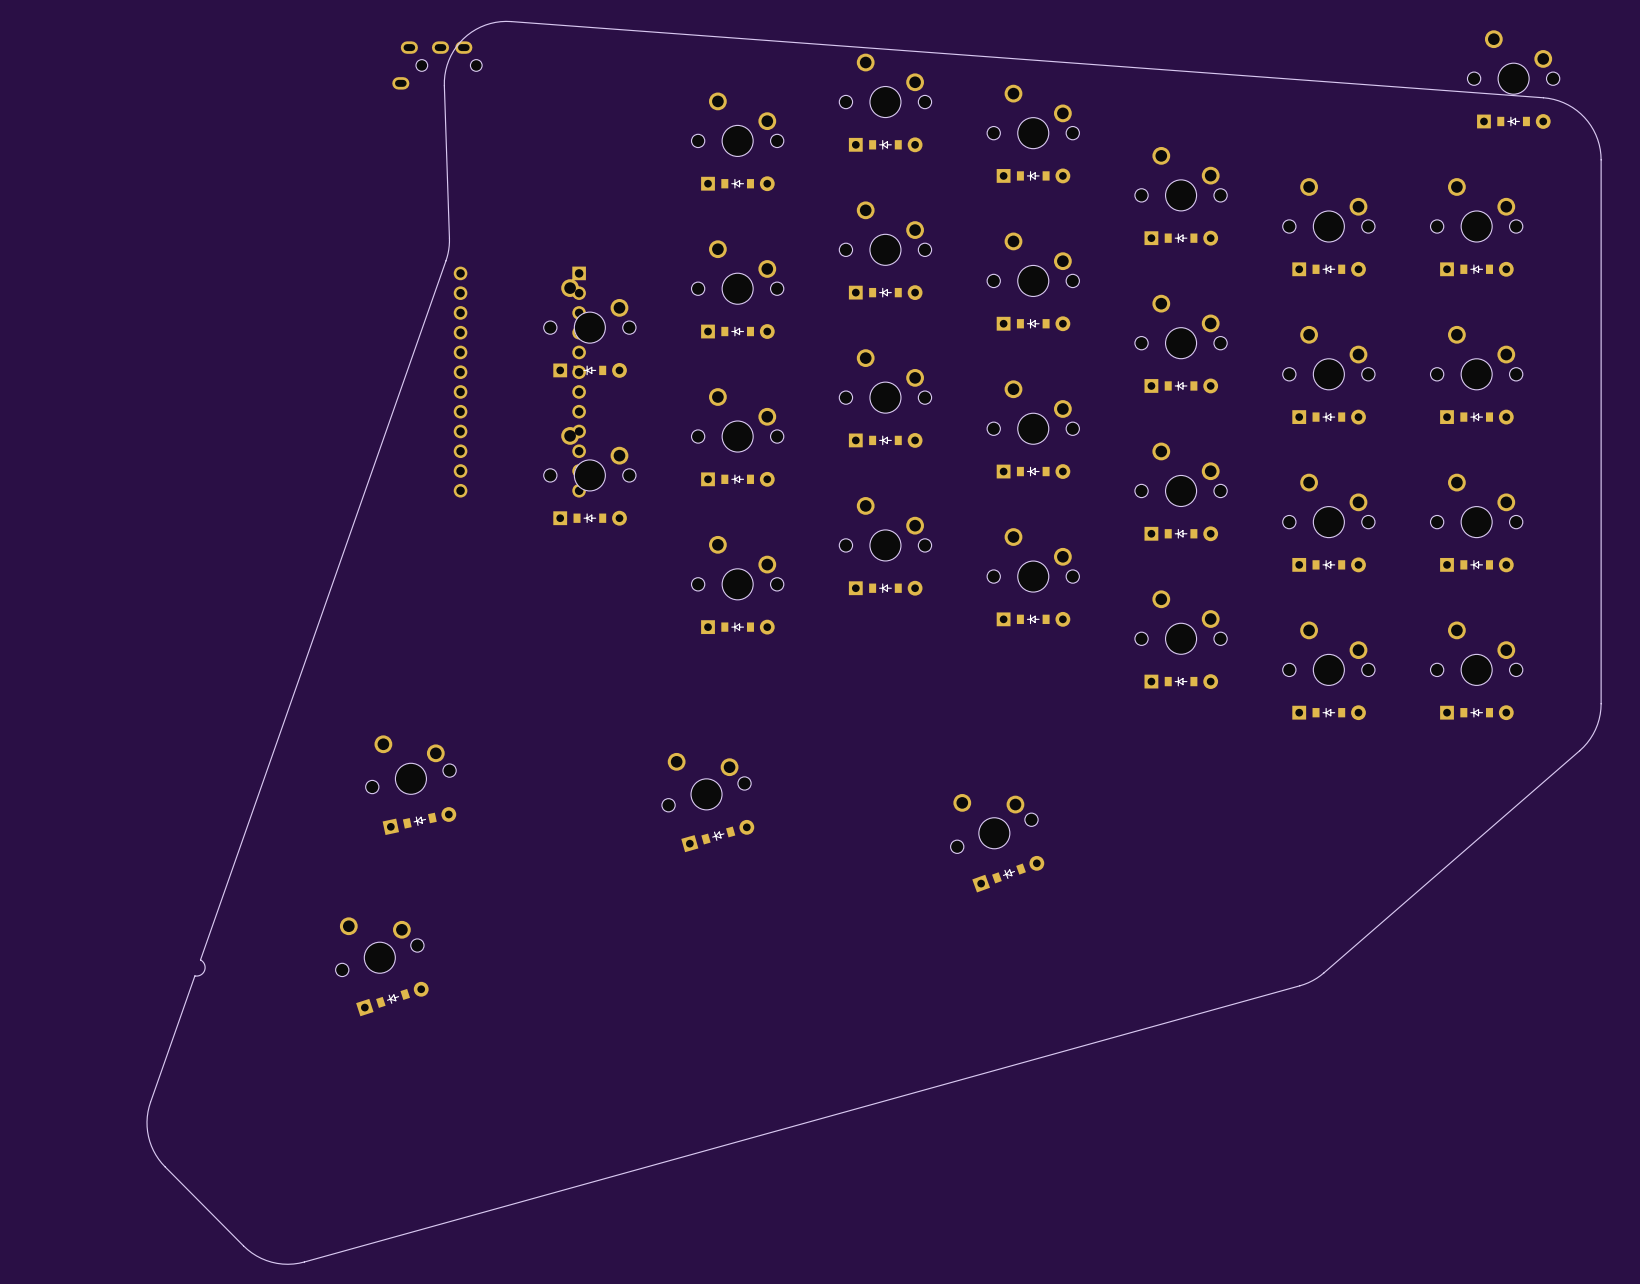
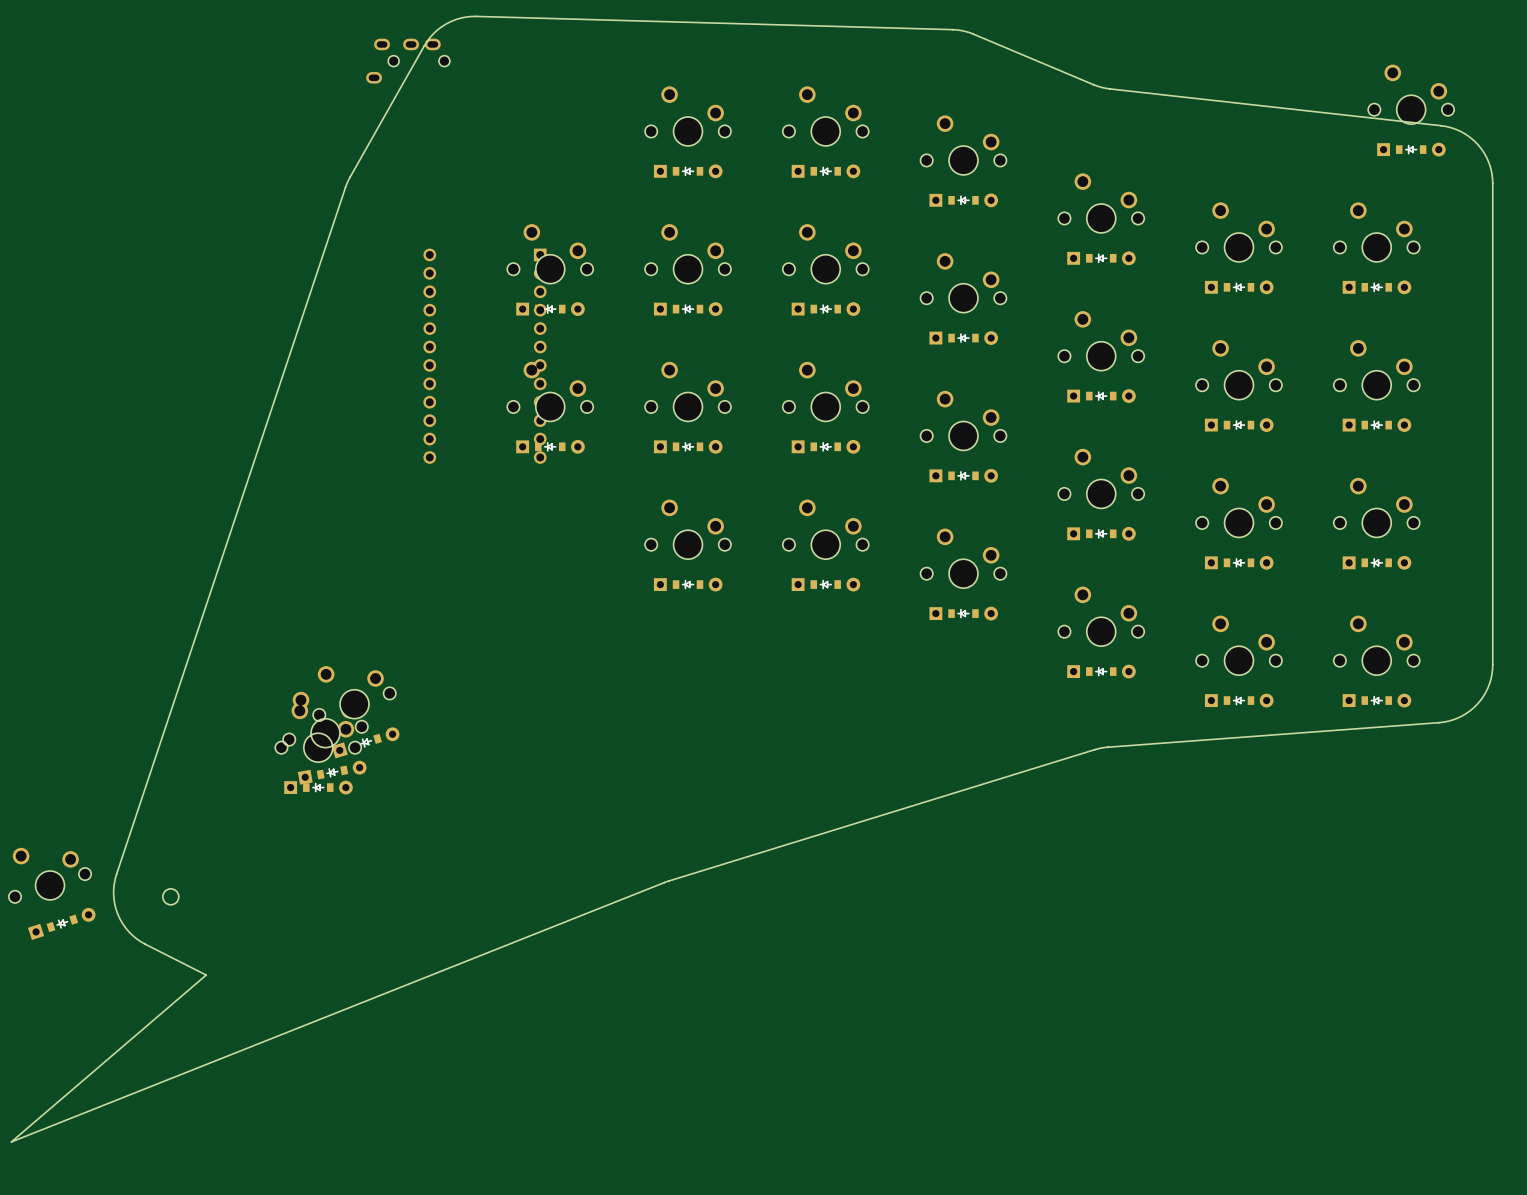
part position: (1513, 62) -> (1411, 94)
part position: (885, 85) -> (825, 116)
part position: (1033, 116) -> (963, 145)
part position: (1513, 121) -> (1411, 149)
part position: (885, 144) -> (825, 171)
part position: (1033, 175) -> (963, 200)
part position: (1181, 178) -> (1101, 203)
board edge: (1601, 196) (1600, 154) (1593, 130) (1576, 110) (1563, 102) (1548, 98) (511, 21) (490, 23) (471, 32) (453, 50) (444, 75) (449, 238) (447, 257) (200, 959) (204, 963) (204, 970) (201, 974) (194, 975) (150, 1102) (147, 1121) (149, 1141) (161, 1163) (247, 1249) (266, 1260) (293, 1264) (1299, 985) (1312, 980) (1324, 972) (1579, 750) (1595, 729) (1601, 703) -> (1492, 183) (1490, 167) (1481, 148) (1470, 137) (1451, 127) (1105, 88) (959, 30) (476, 16) (460, 18) (441, 26) (424, 45) (346, 184) (115, 879) (114, 904) (120, 919) (129, 931) (145, 944) (206, 975) (11, 1141) (666, 881) (1094, 749) (1439, 722) (1453, 719) (1470, 710) (1483, 696) (1490, 679) (1492, 656)
part position: (1328, 210) -> (1239, 232)
part position: (1476, 210) -> (1376, 232)
part position: (885, 233) -> (825, 253)
part position: (1181, 238) -> (1101, 258)
part position: (1033, 264) -> (963, 282)
part position: (1329, 269) -> (1239, 287)
part position: (1476, 269) -> (1376, 287)
part position: (885, 292) -> (825, 309)
part position: (589, 311) -> (550, 253)
part position: (1033, 323) -> (963, 338)
part position: (1181, 326) -> (1101, 340)
part position: (1328, 357) -> (1239, 369)
part position: (1476, 357) -> (1376, 369)
part position: (590, 370) -> (550, 309)
part position: (885, 381) -> (825, 391)
part position: (1181, 385) -> (1101, 396)
part position: (1033, 412) -> (963, 420)
part position: (1329, 417) -> (1239, 425)
part position: (1476, 417) -> (1376, 425)
part position: (885, 440) -> (825, 446)
part position: (589, 458) -> (550, 391)
part position: (1033, 471) -> (963, 475)
part position: (1181, 474) -> (1101, 478)
part position: (1328, 505) -> (1239, 507)
part position: (1476, 505) -> (1376, 507)
part position: (590, 518) -> (550, 446)
part position: (885, 528) -> (825, 529)
part position: (1181, 533) -> (1101, 533)
part position: (1033, 560) -> (963, 558)
part position: (1329, 564) -> (1239, 562)
part position: (1476, 564) -> (1376, 562)
part position: (885, 588) -> (825, 584)
part position: (1033, 619) -> (963, 613)
part position: (1181, 622) -> (1101, 616)
part position: (1328, 653) -> (1239, 645)
part position: (1476, 653) -> (1376, 645)
part position: (1181, 681) -> (1101, 671)
part position: (1329, 712) -> (1239, 700)
part position: (1476, 712) -> (1376, 700)
part: none -> (354, 693)
part: (410, 764) -> none
part: none -> (325, 719)
part: (706, 782) -> none
part: none -> (318, 732)
part: none -> (365, 742)
part: (419, 821) -> none
part: (994, 823) -> none
part: none -> (332, 772)
part: (717, 836) -> none
part: none -> (318, 787)
part: (1008, 874) -> none
part: none -> (50, 875)
part: (379, 946) -> none
round board edge: none -> [162, 888, 180, 906]
part: none -> (61, 923)
part: (392, 999) -> none

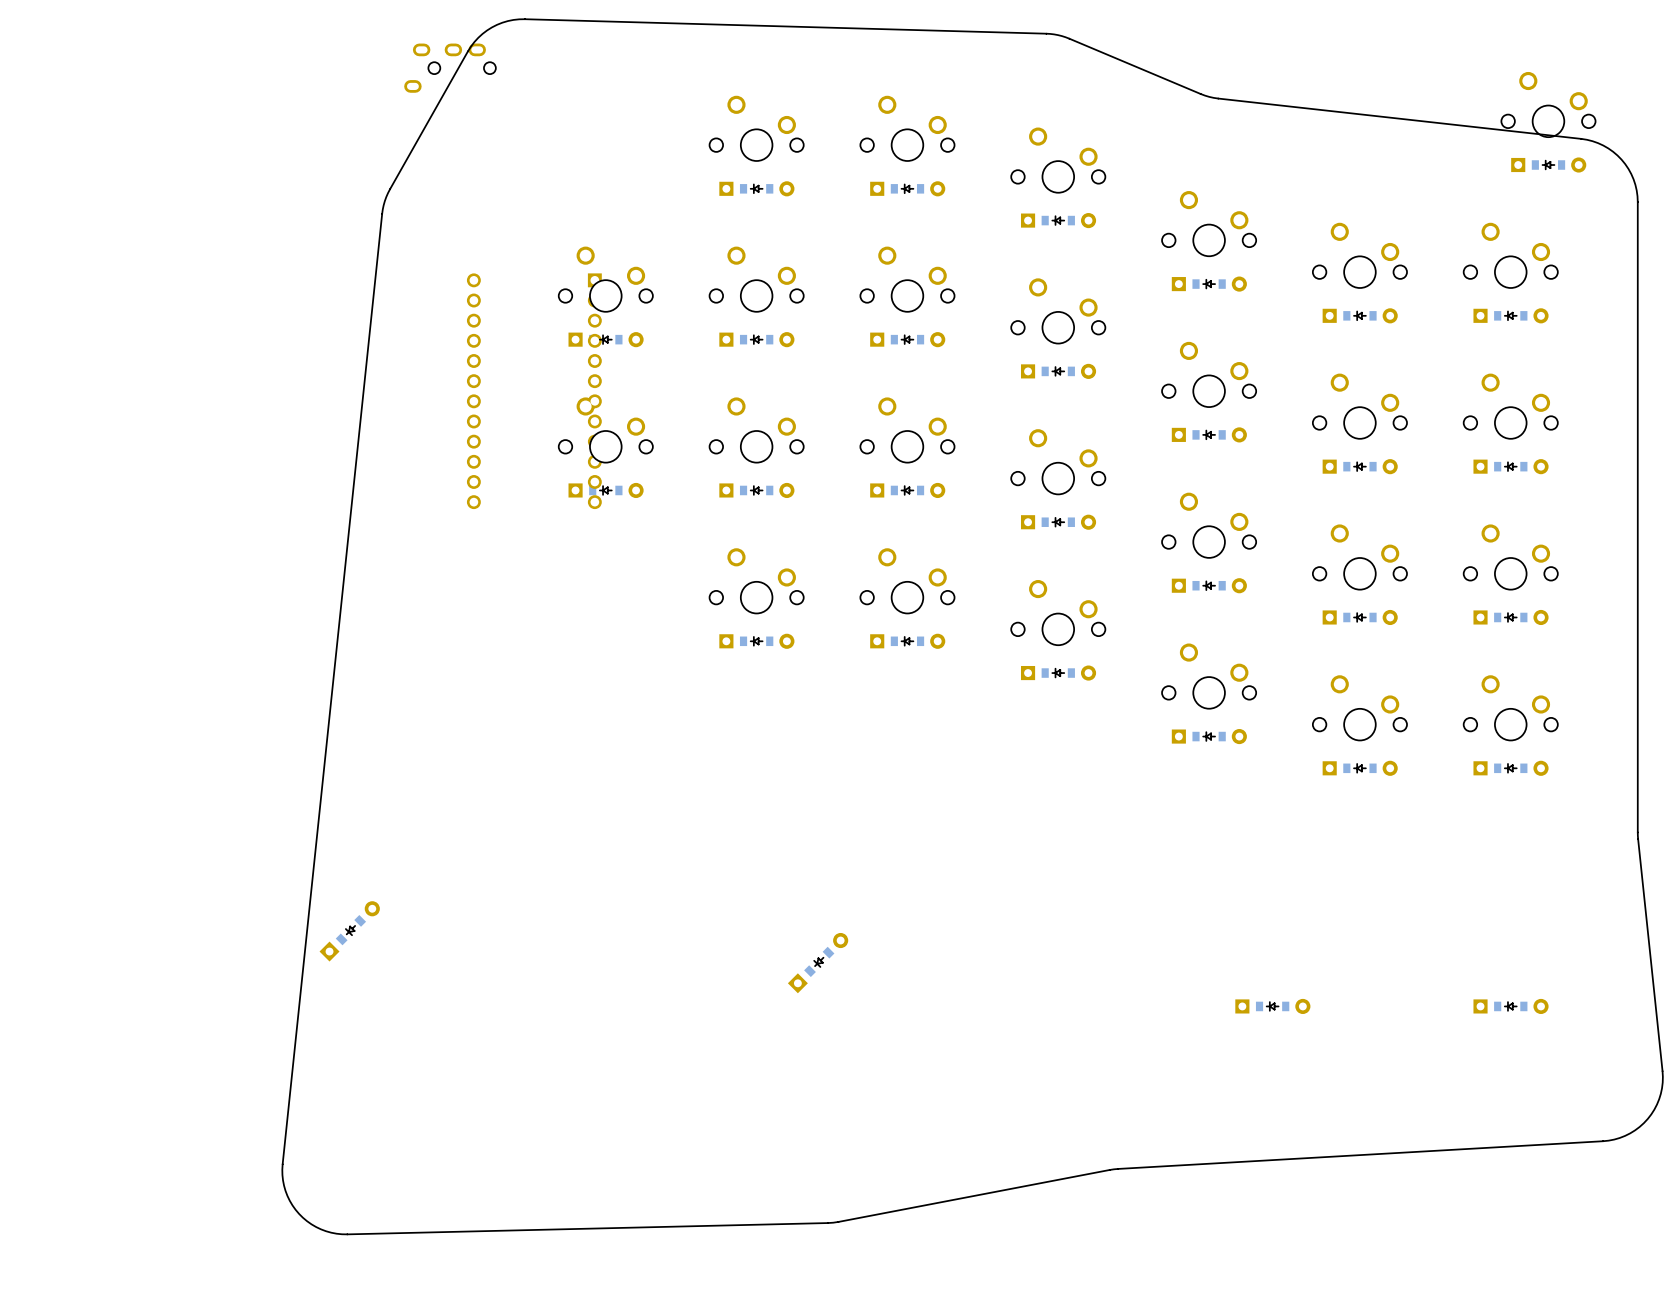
board edge: (353, 171) (345, 187) (114, 884) (114, 899) (117, 914) (132, 935) (145, 944) (206, 975) (11, 1141) (668, 881) (1101, 748) (1448, 721) (1466, 713) (1480, 700) (1489, 683) (1492, 664) -> (390, 189) (382, 213) (282, 1164) (284, 1185) (292, 1205) (302, 1217) (321, 1229) (347, 1234) (833, 1222) (1113, 1169) (1603, 1141) (1619, 1137) (1639, 1126) (1651, 1114) (1659, 1099) (1662, 1082) (1637, 835) (1637, 729)
part: (354, 693) -> none
part: (325, 719) -> none
part: (318, 732) -> none
part: (365, 742) -> none
part: (332, 772) -> none
part: (318, 787) -> none
part: none -> (349, 931)
part: (50, 875) -> none
part: none -> (818, 963)
round board edge: [162, 888, 180, 906] -> none
part: none -> (1272, 1006)
part: none -> (1511, 1006)
part: (61, 923) -> none

